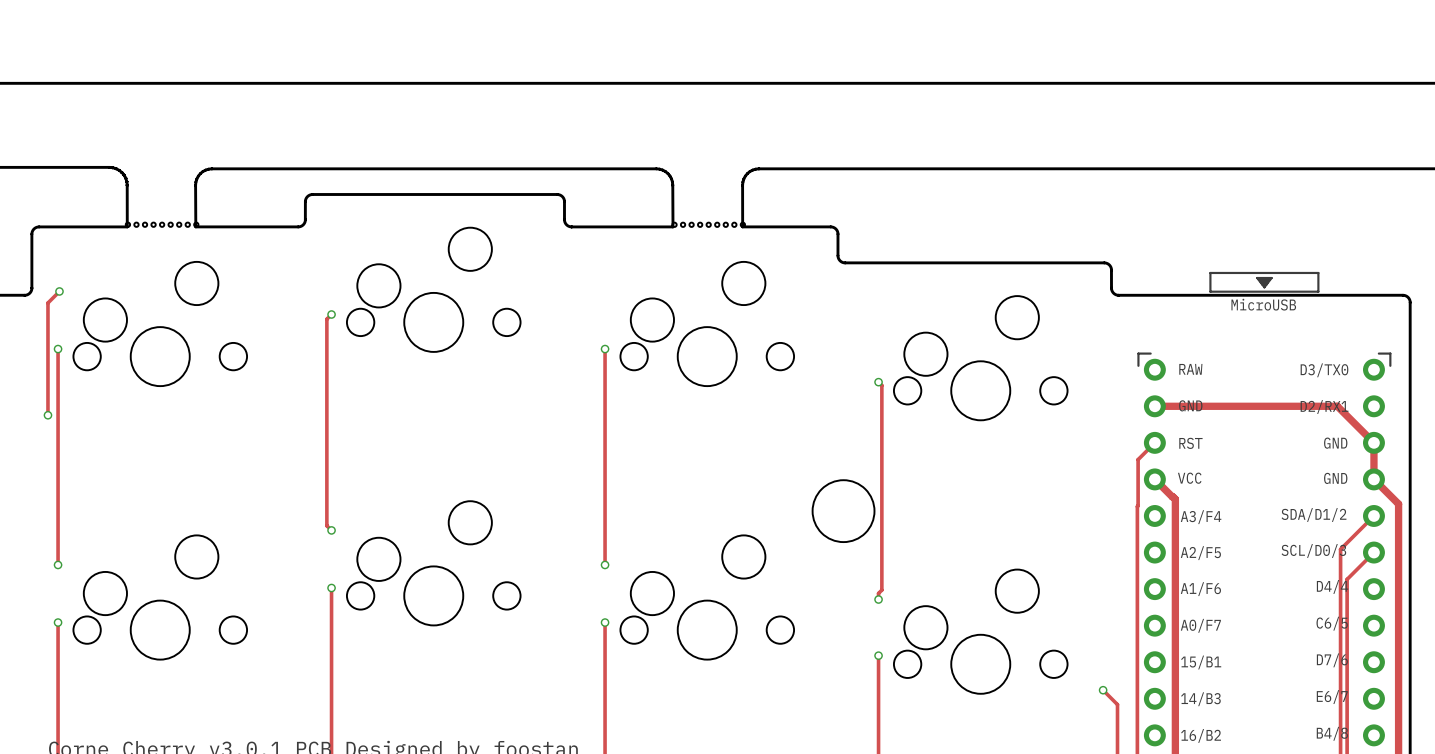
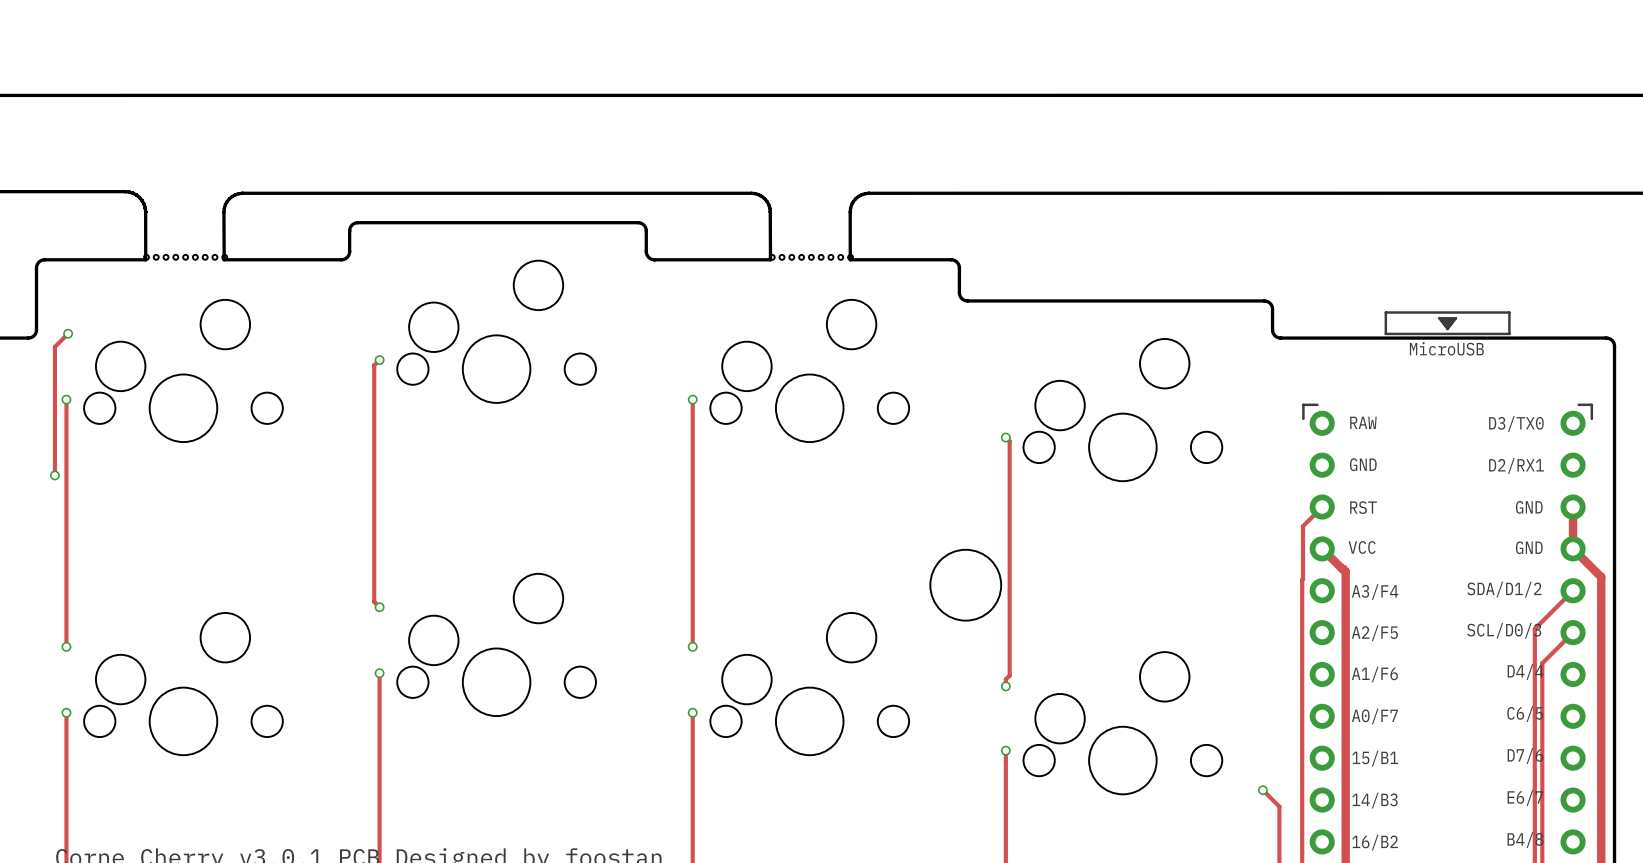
track: (1154, 406) (1337, 406) (1373, 442) -> none

